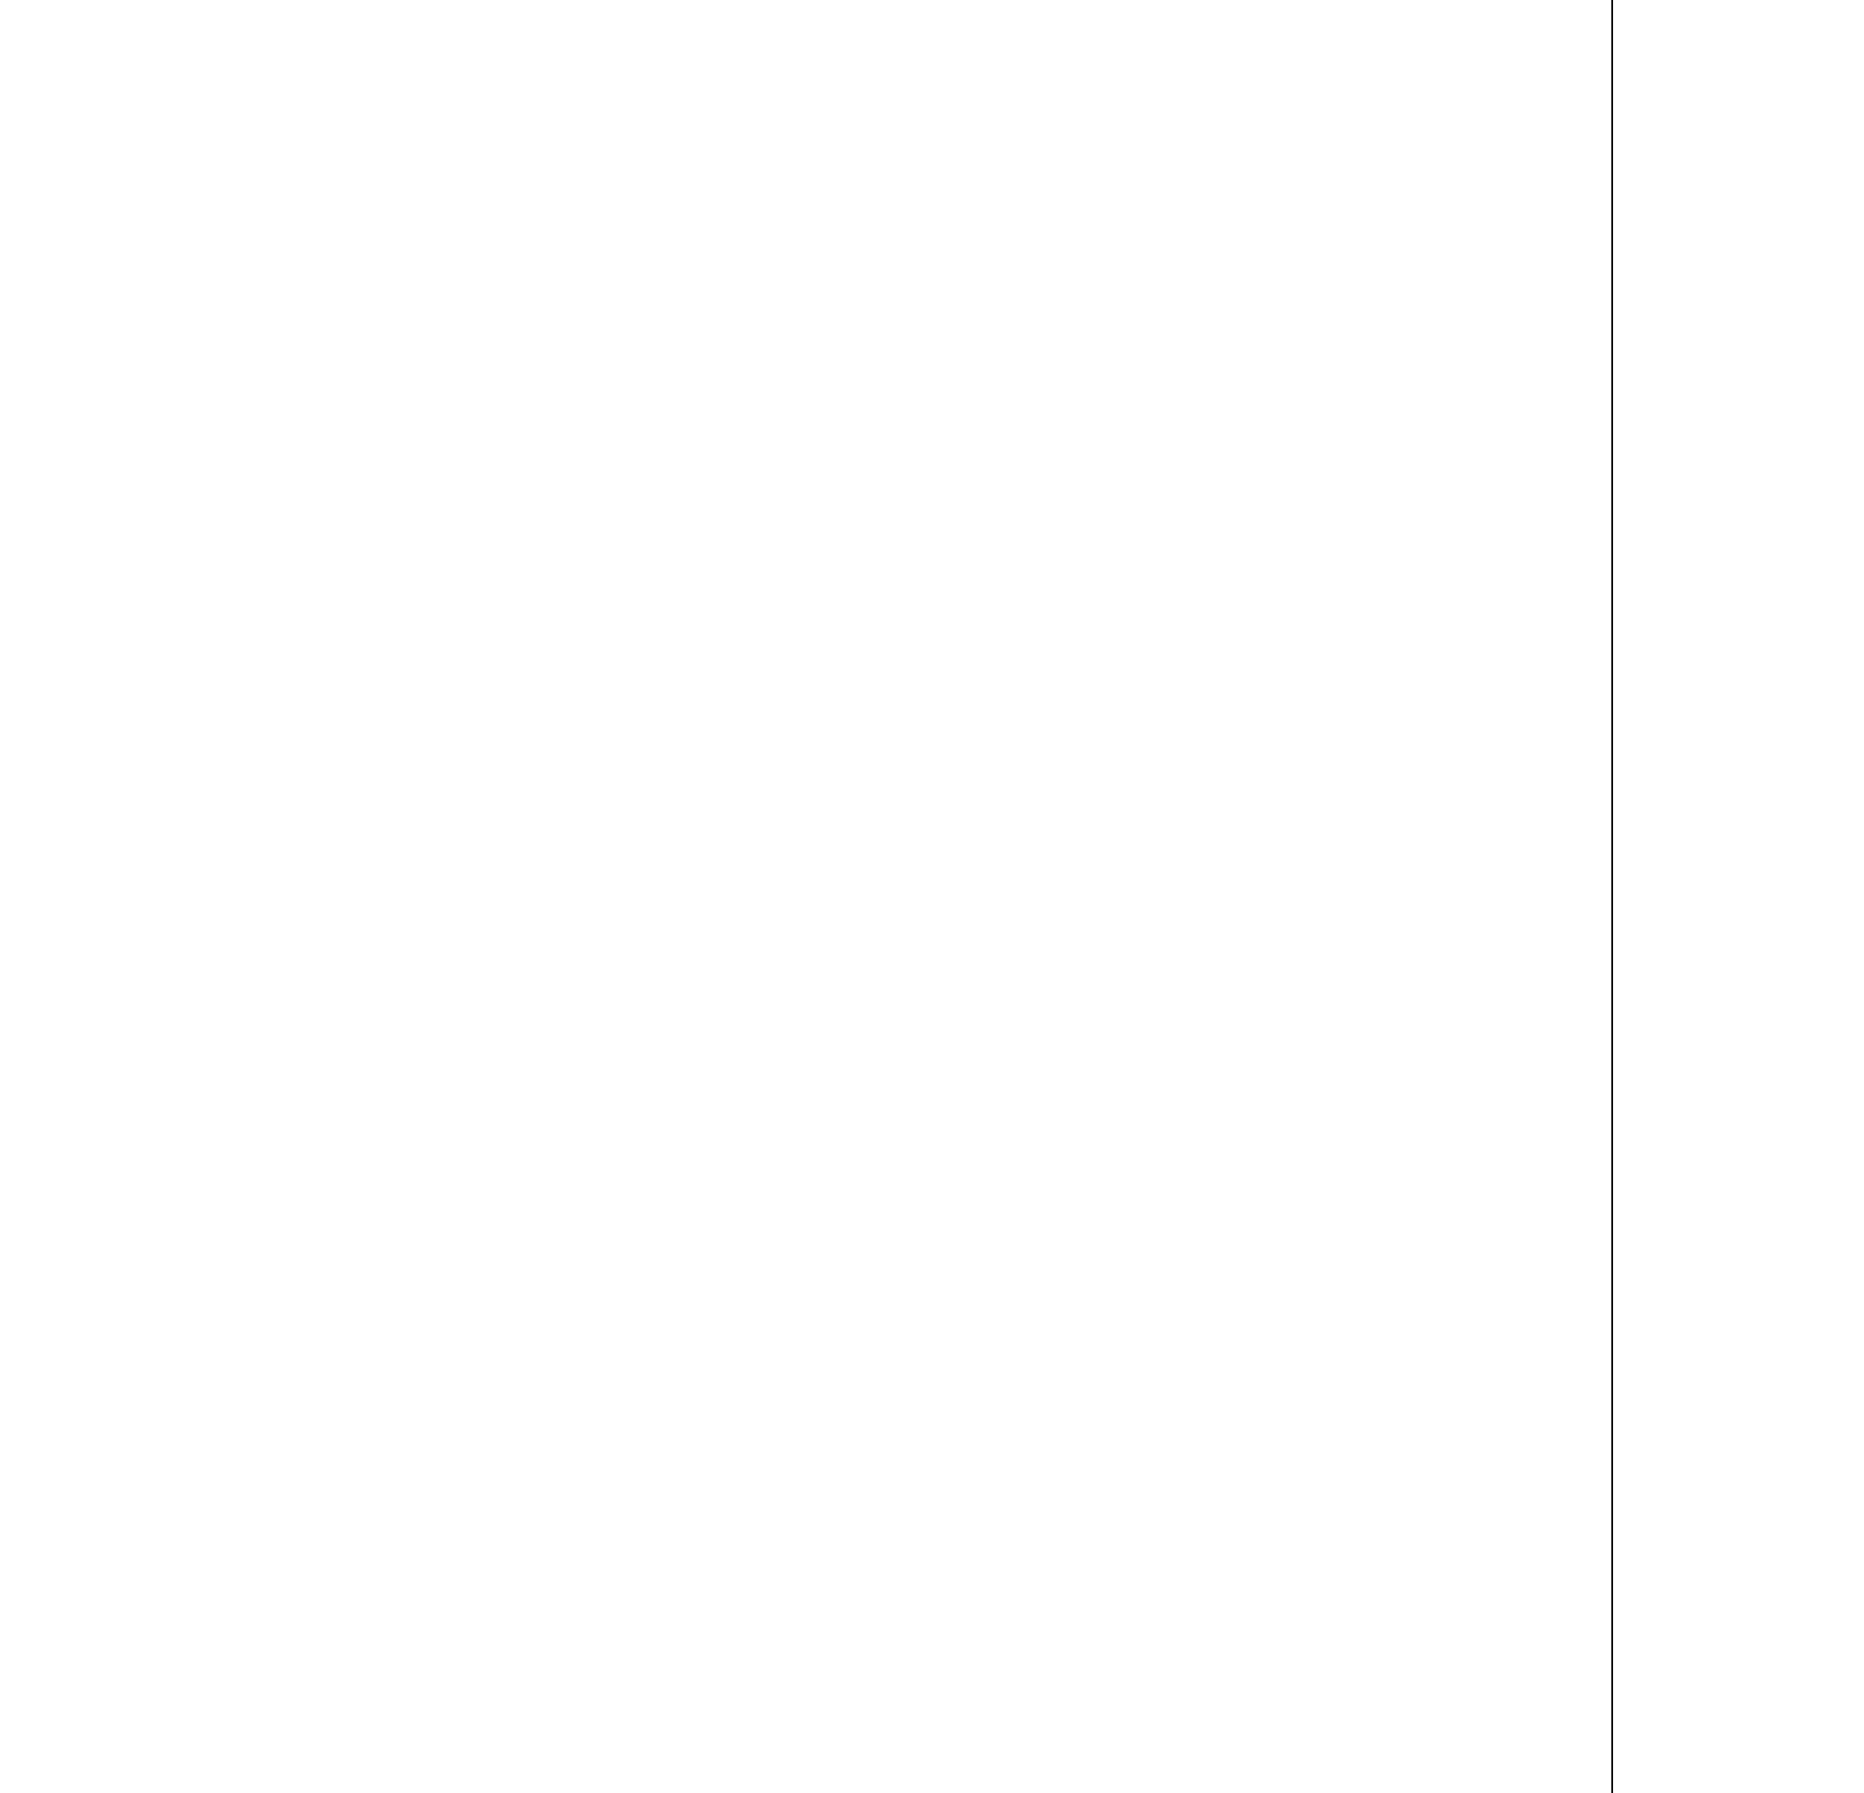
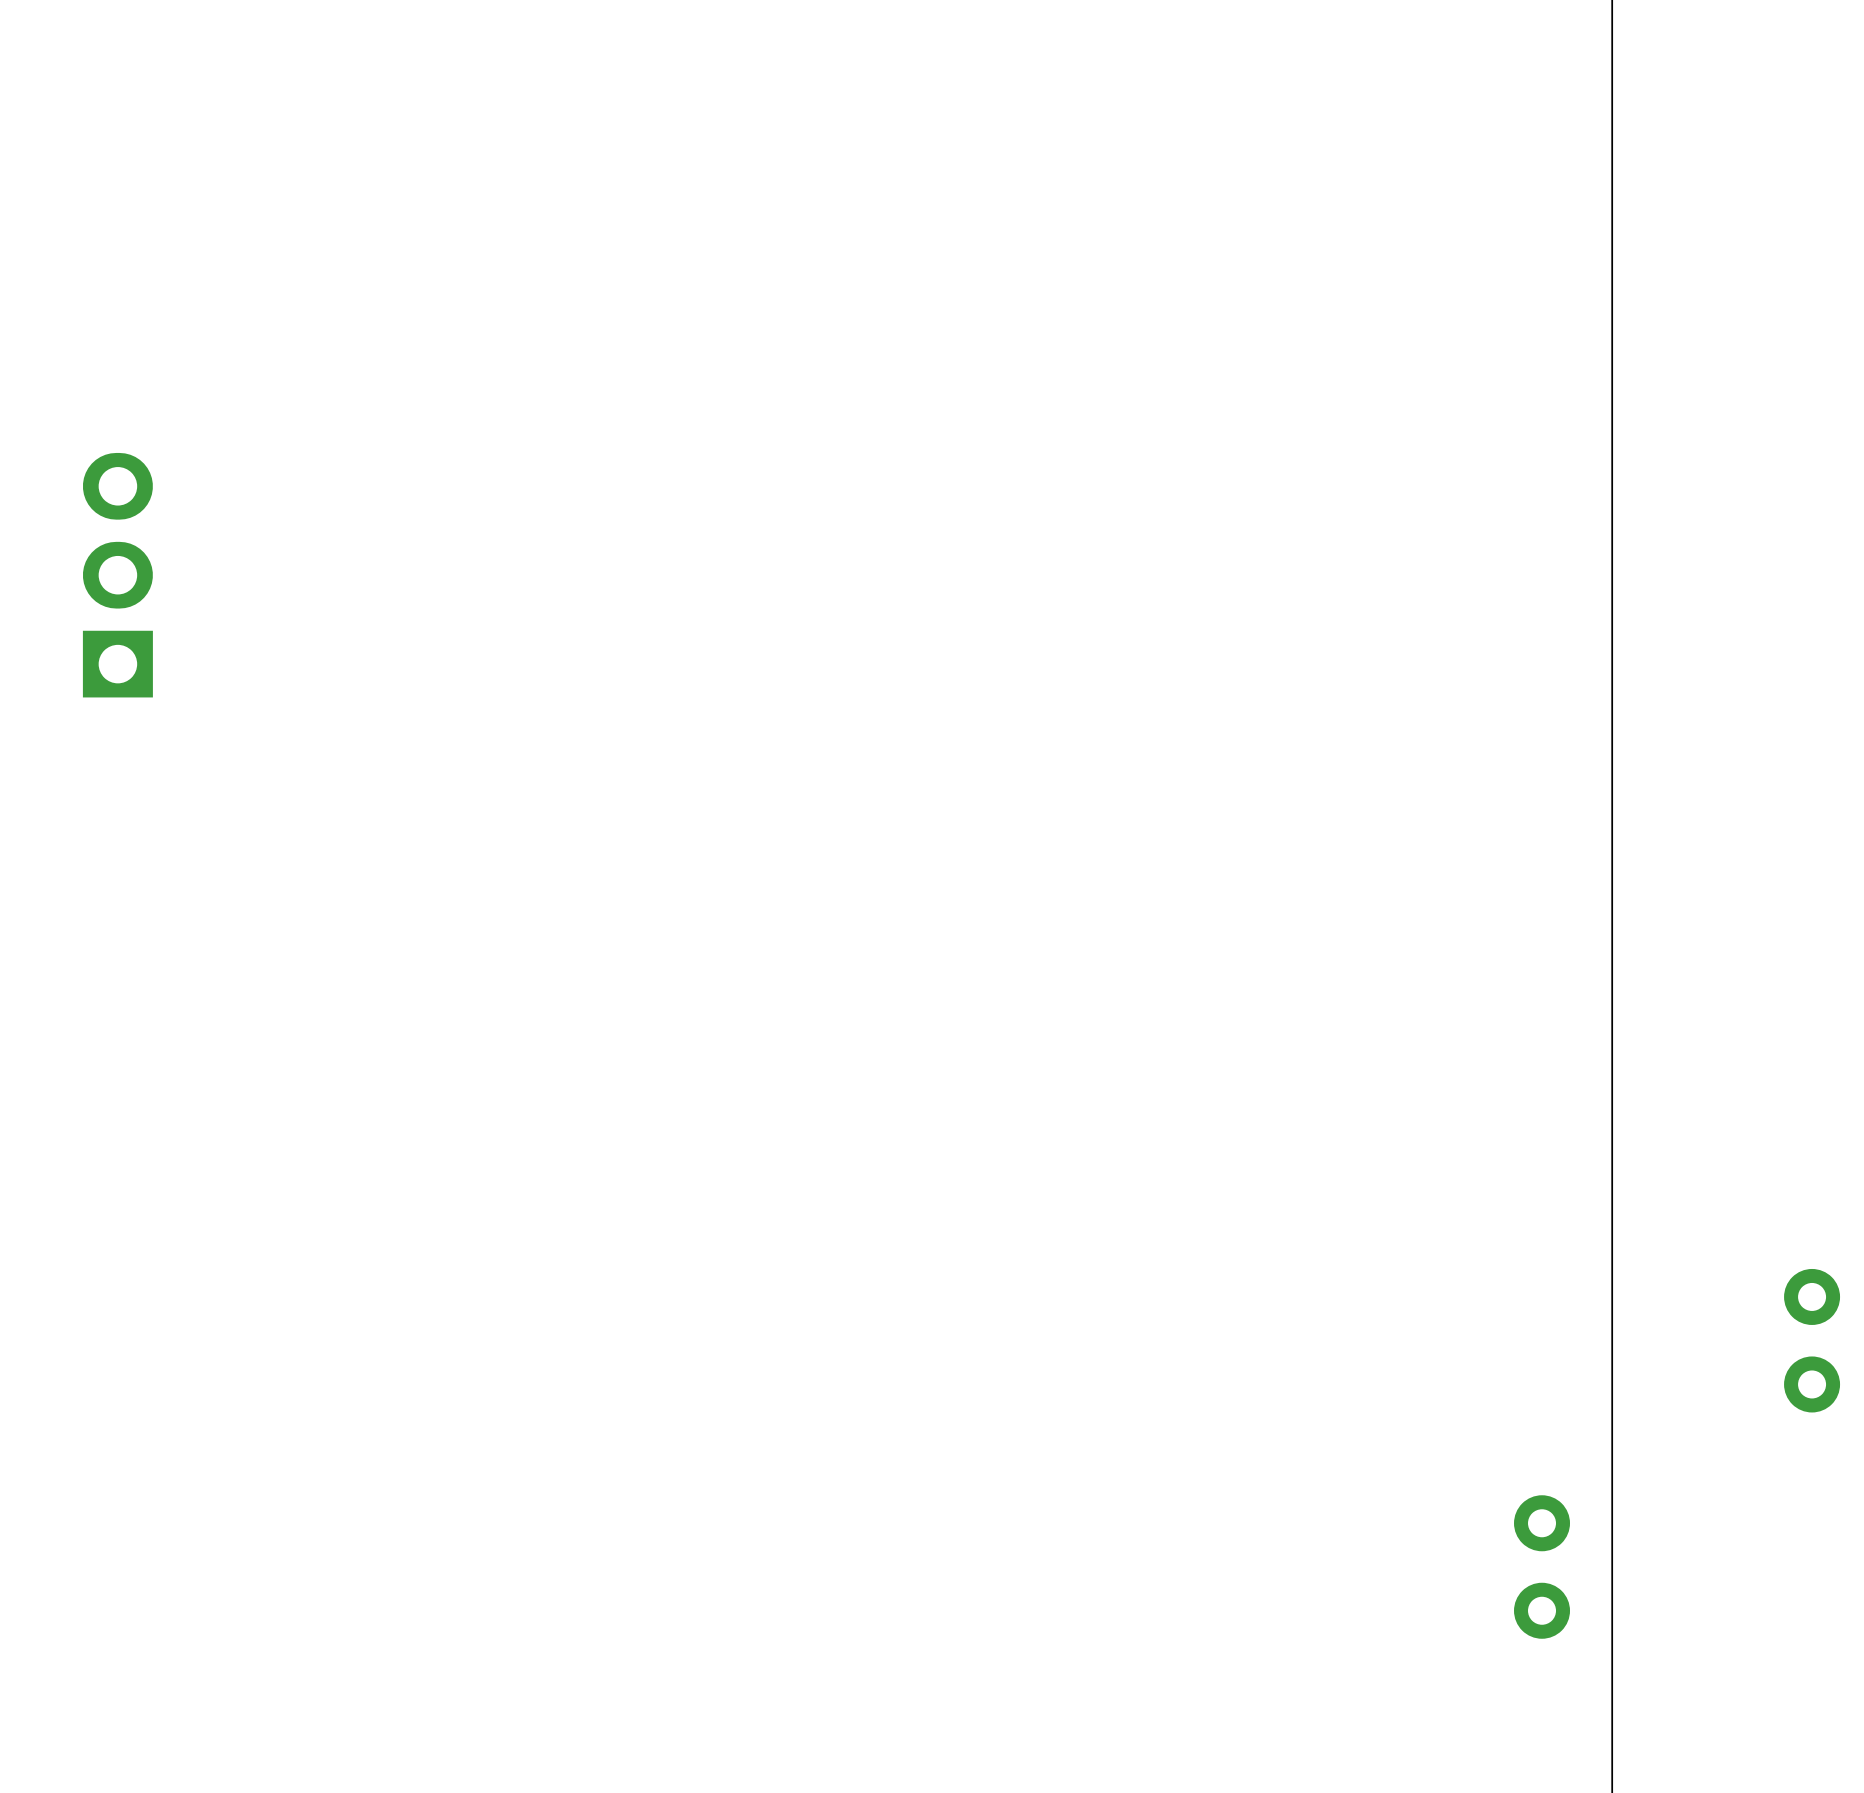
part: none -> (117, 575)
part: none -> (1812, 1340)
part: none -> (1542, 1567)

